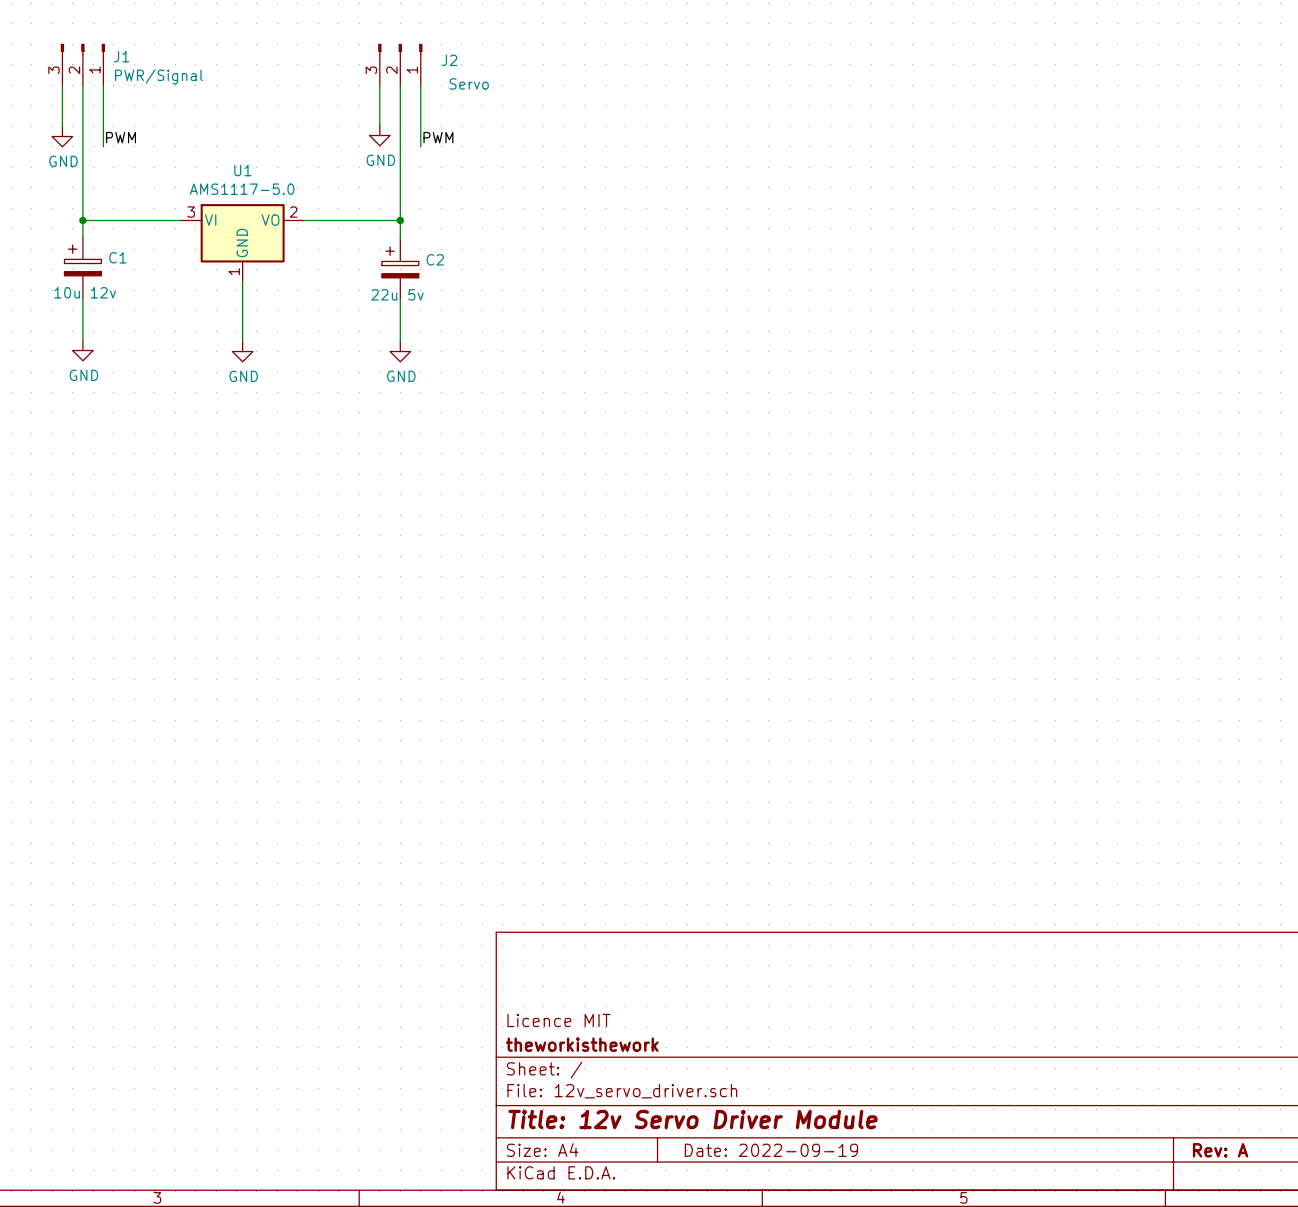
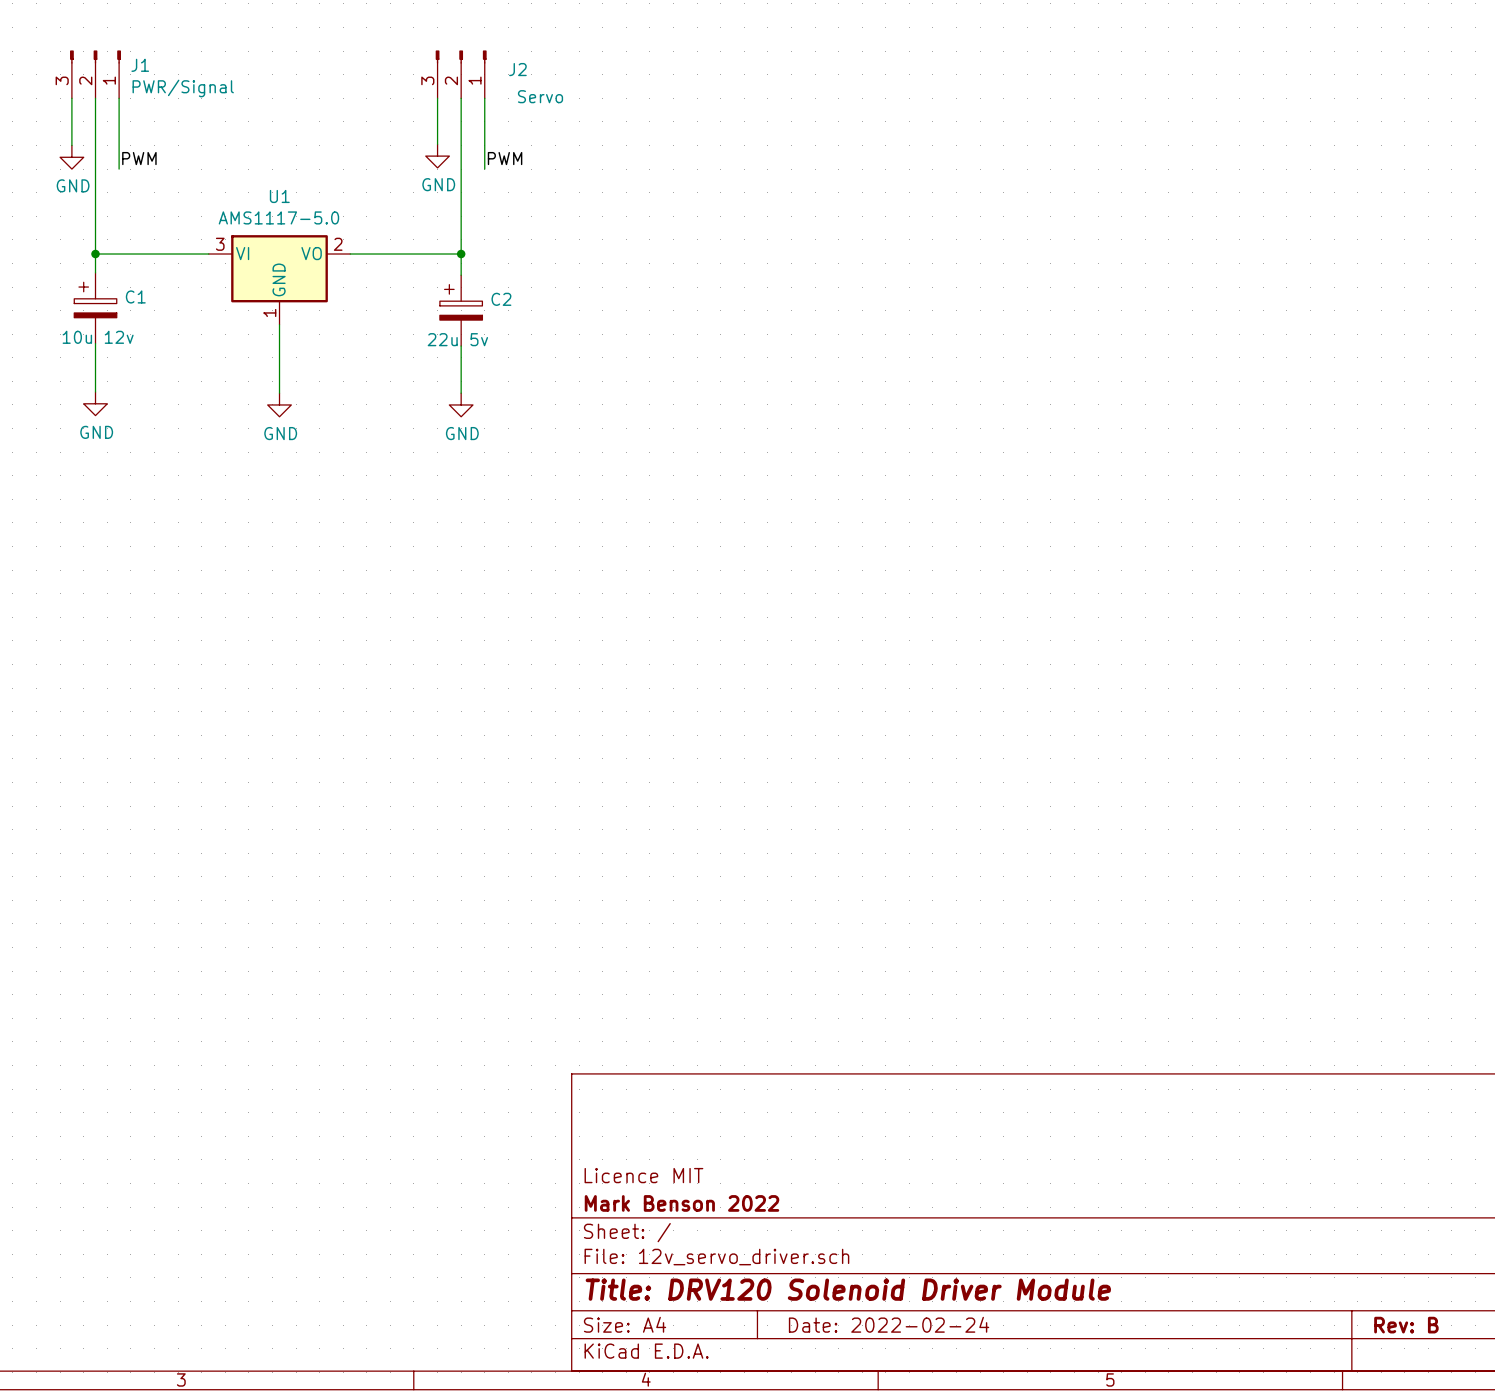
title block: theworkisthework (582, 1044) -> Mark Benson 2022 (682, 1203)
title block: Title: 12v Servo Driver Module (693, 1119) -> Title: DRV120 Solenoid Driver Module (848, 1289)
title block: Date: 2022-09-19 (771, 1150) -> Date: 2022-02-24 (889, 1324)
title block: Rev: A (1220, 1150) -> Rev: B (1406, 1325)

